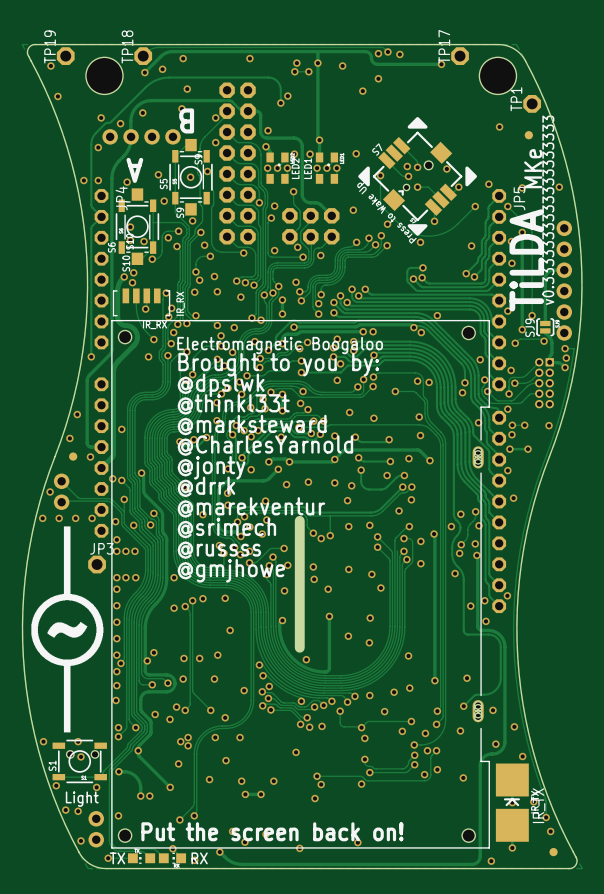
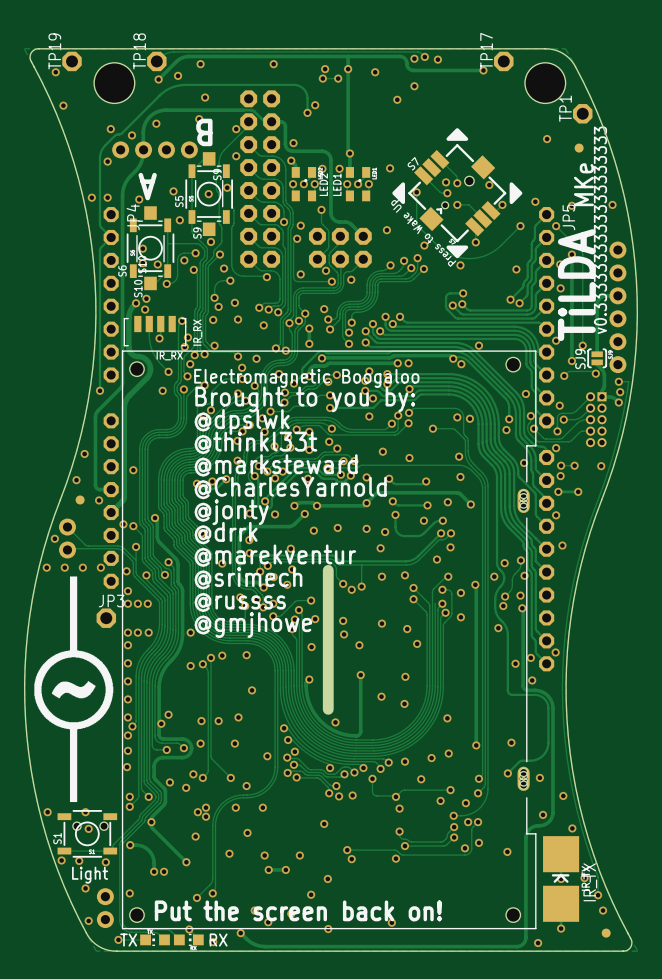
via: (460, 730) -> none
via position: (315, 798) -> (327, 878)
via position: (65, 810) -> (79, 860)
via: none -> (311, 894)

